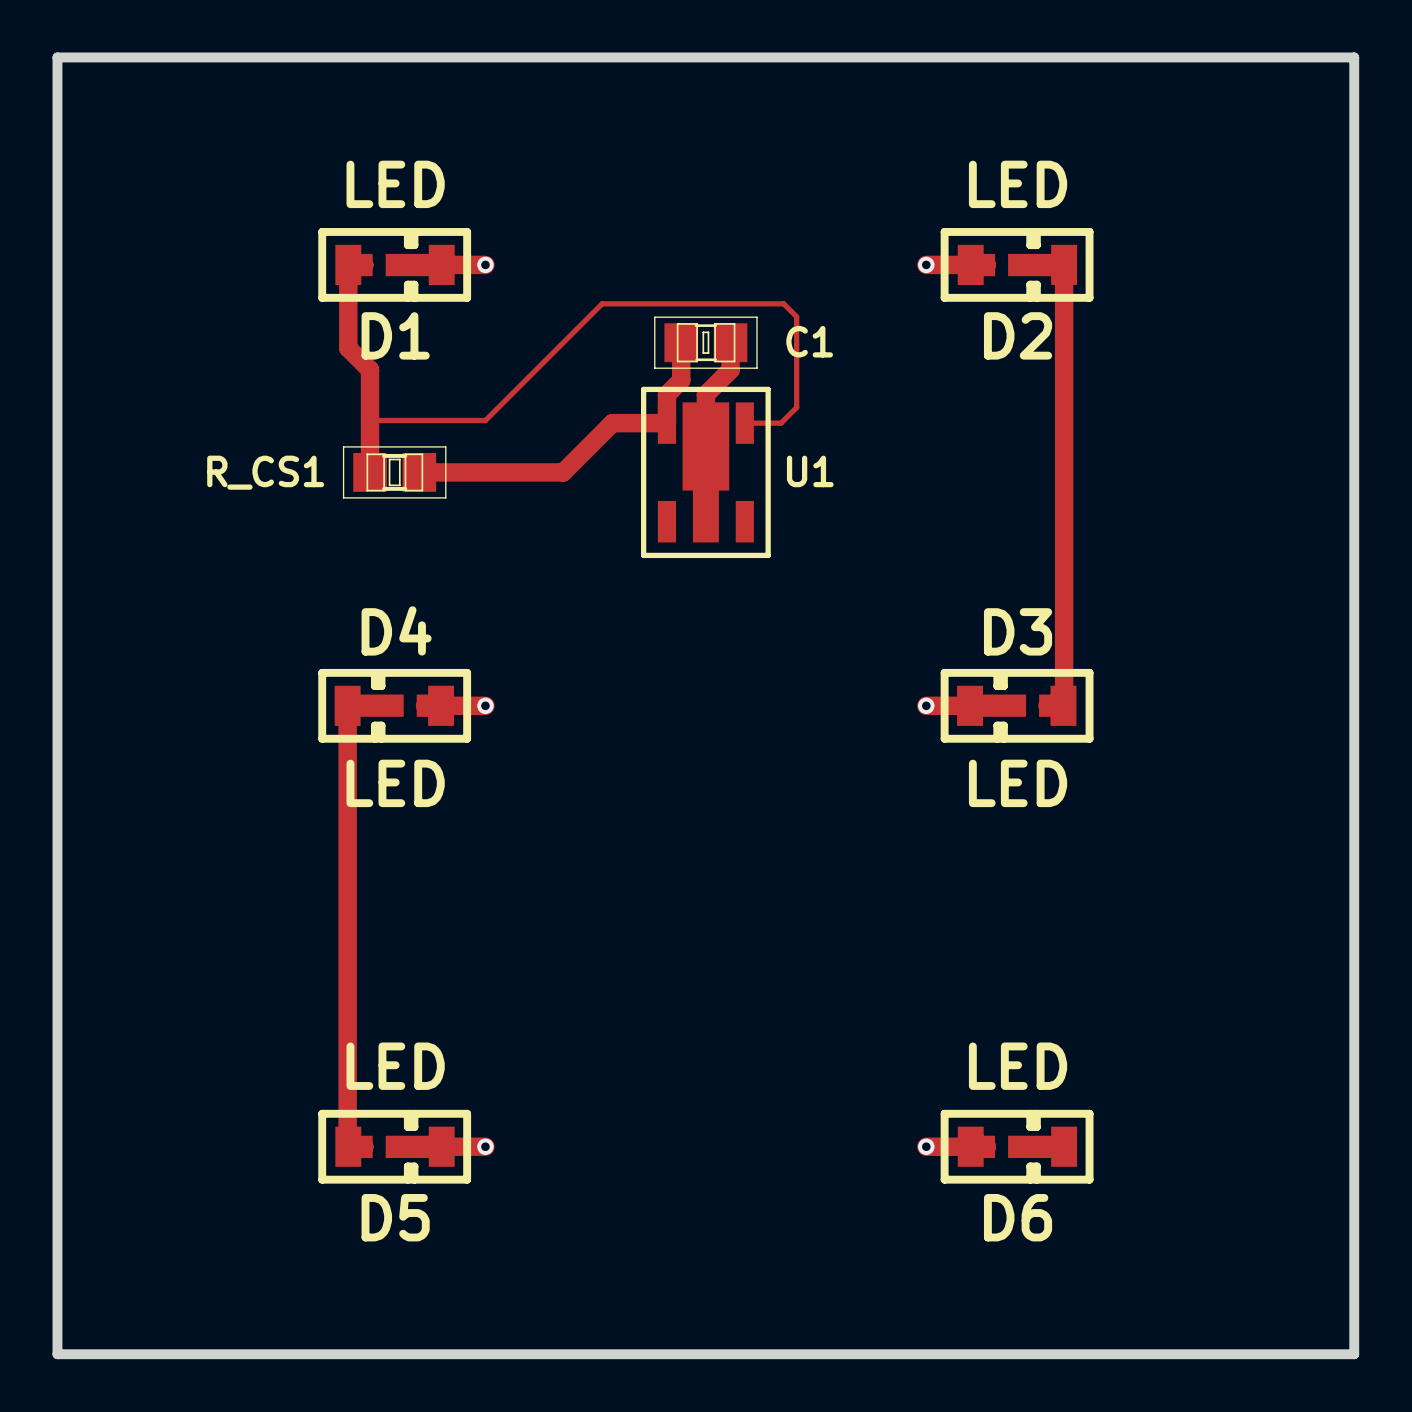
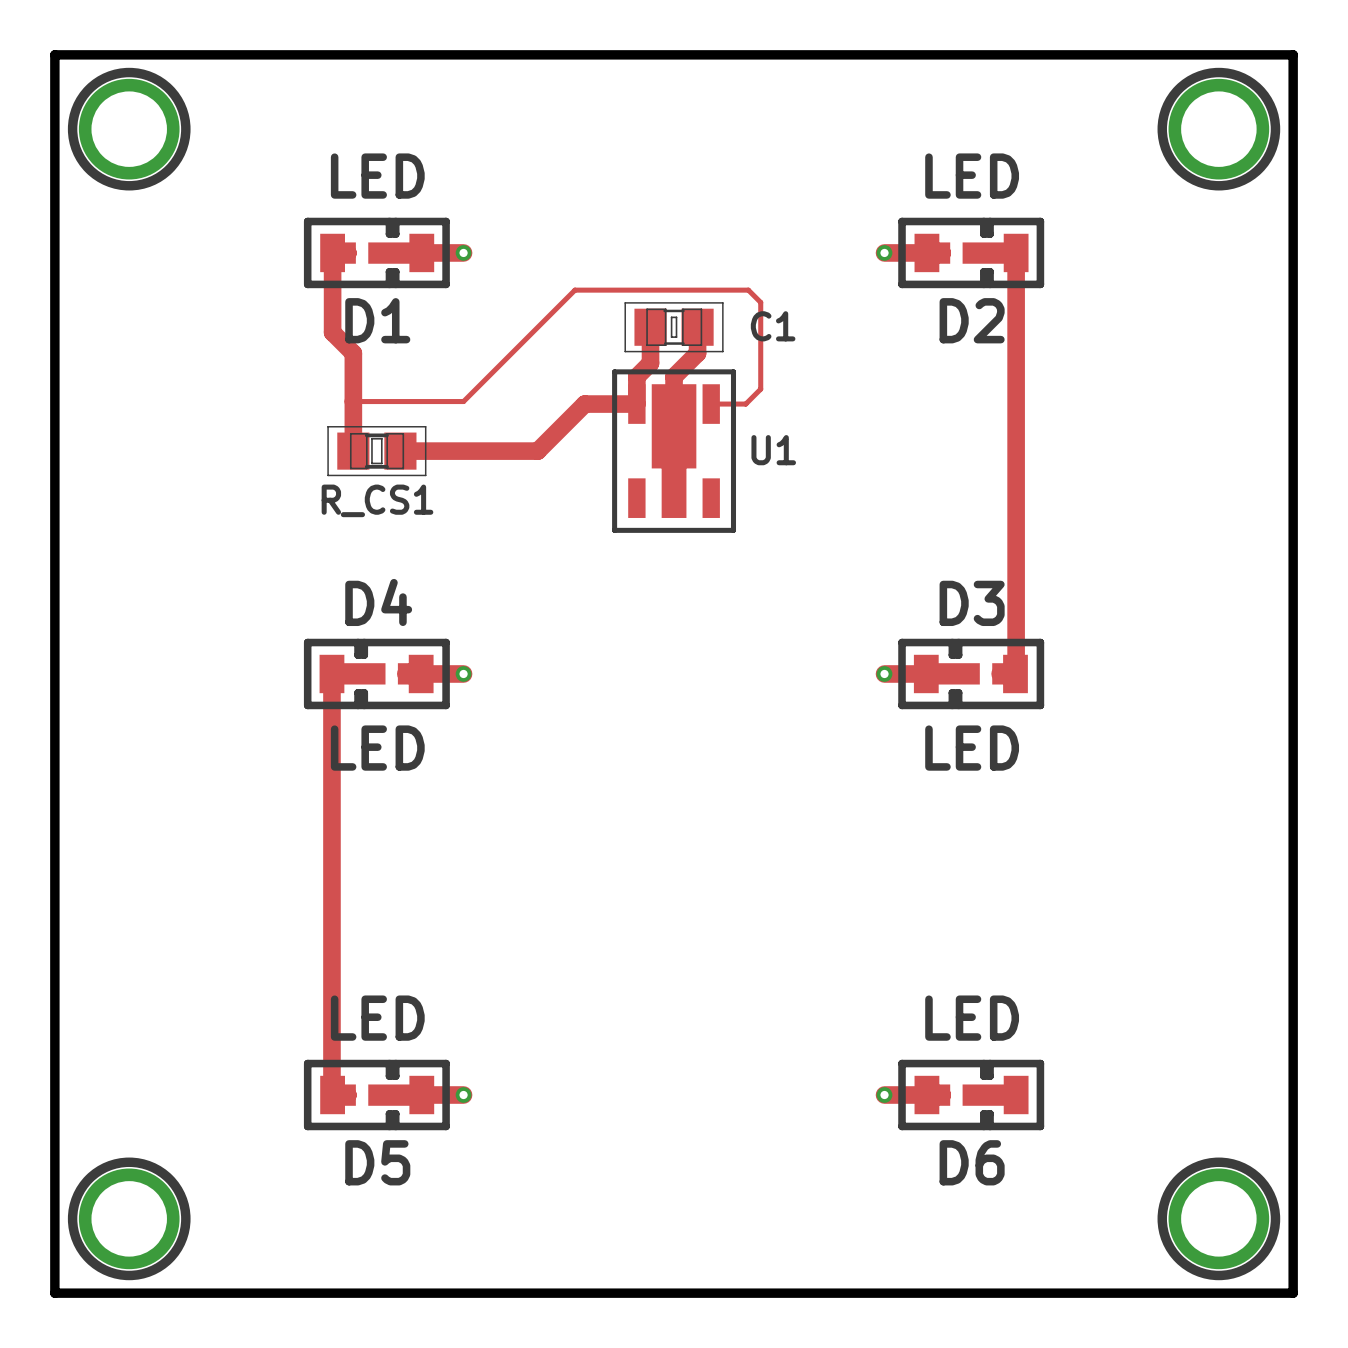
part: none -> (129, 129)
part: none -> (1218, 129)
R_CS1 name position: R_CS1 (265, 472) -> R_CS1 (377, 500)
part: none -> (129, 1218)
part: none -> (1218, 1218)

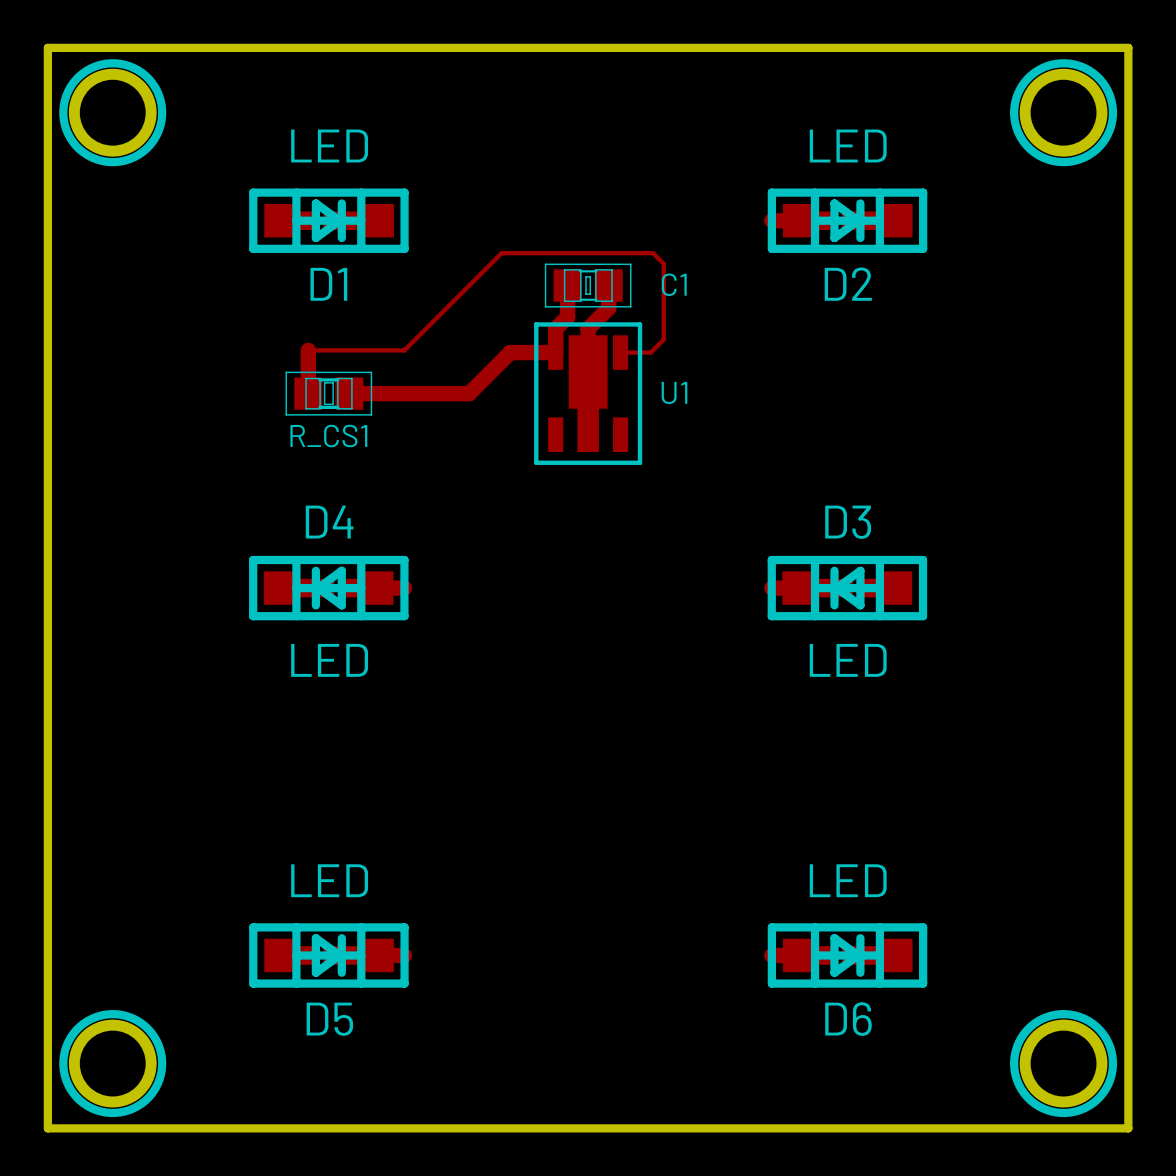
D1 footprint: [303, 217, 450, 289] -> [249, 188, 409, 253]
D2 footprint: [898, 217, 1045, 289] -> [767, 188, 928, 253]
track: (347, 252) (332, 252) (332, 332) (353, 353) (352, 401) -> none
via: (463, 252) -> none
via: (884, 252) -> none
track: (983, 253) (1016, 253) (1015, 673) -> none
D4 footprint: [303, 638, 450, 710] -> [249, 555, 409, 621]
D3 footprint: [898, 638, 1045, 710] -> [767, 555, 928, 621]
track: (364, 673) (331, 673) (331, 1094) (347, 1095) -> none
via: (463, 673) -> none
via: (884, 673) -> none
D5 footprint: [303, 1059, 450, 1131] -> [249, 923, 409, 988]
D6 footprint: [898, 1059, 1045, 1131] -> [767, 923, 928, 988]
via: (463, 1095) -> none
via: (884, 1095) -> none

